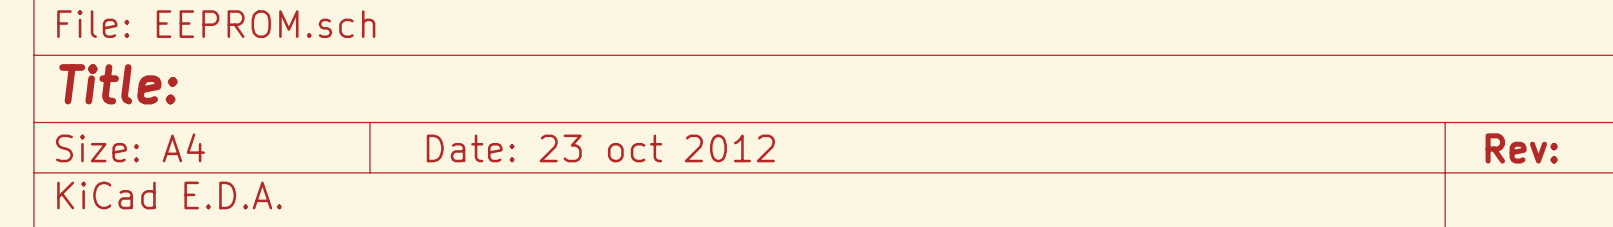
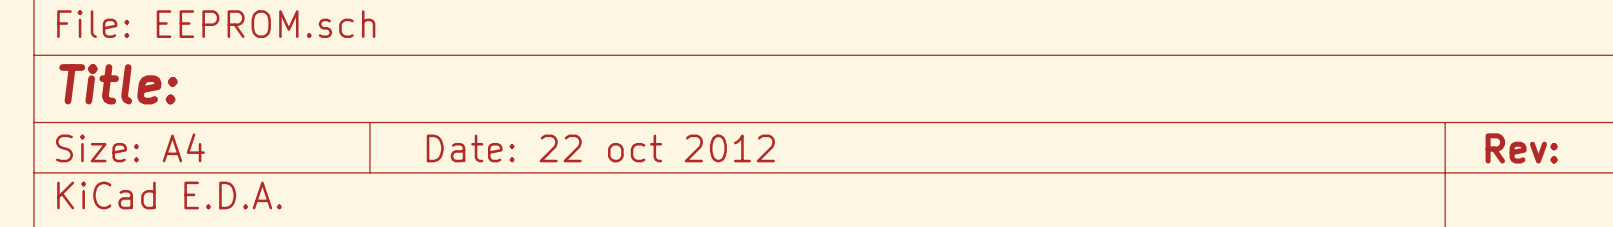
title block: Date: 23 oct 2012 (600, 148) -> Date: 22 oct 2012 (600, 148)

